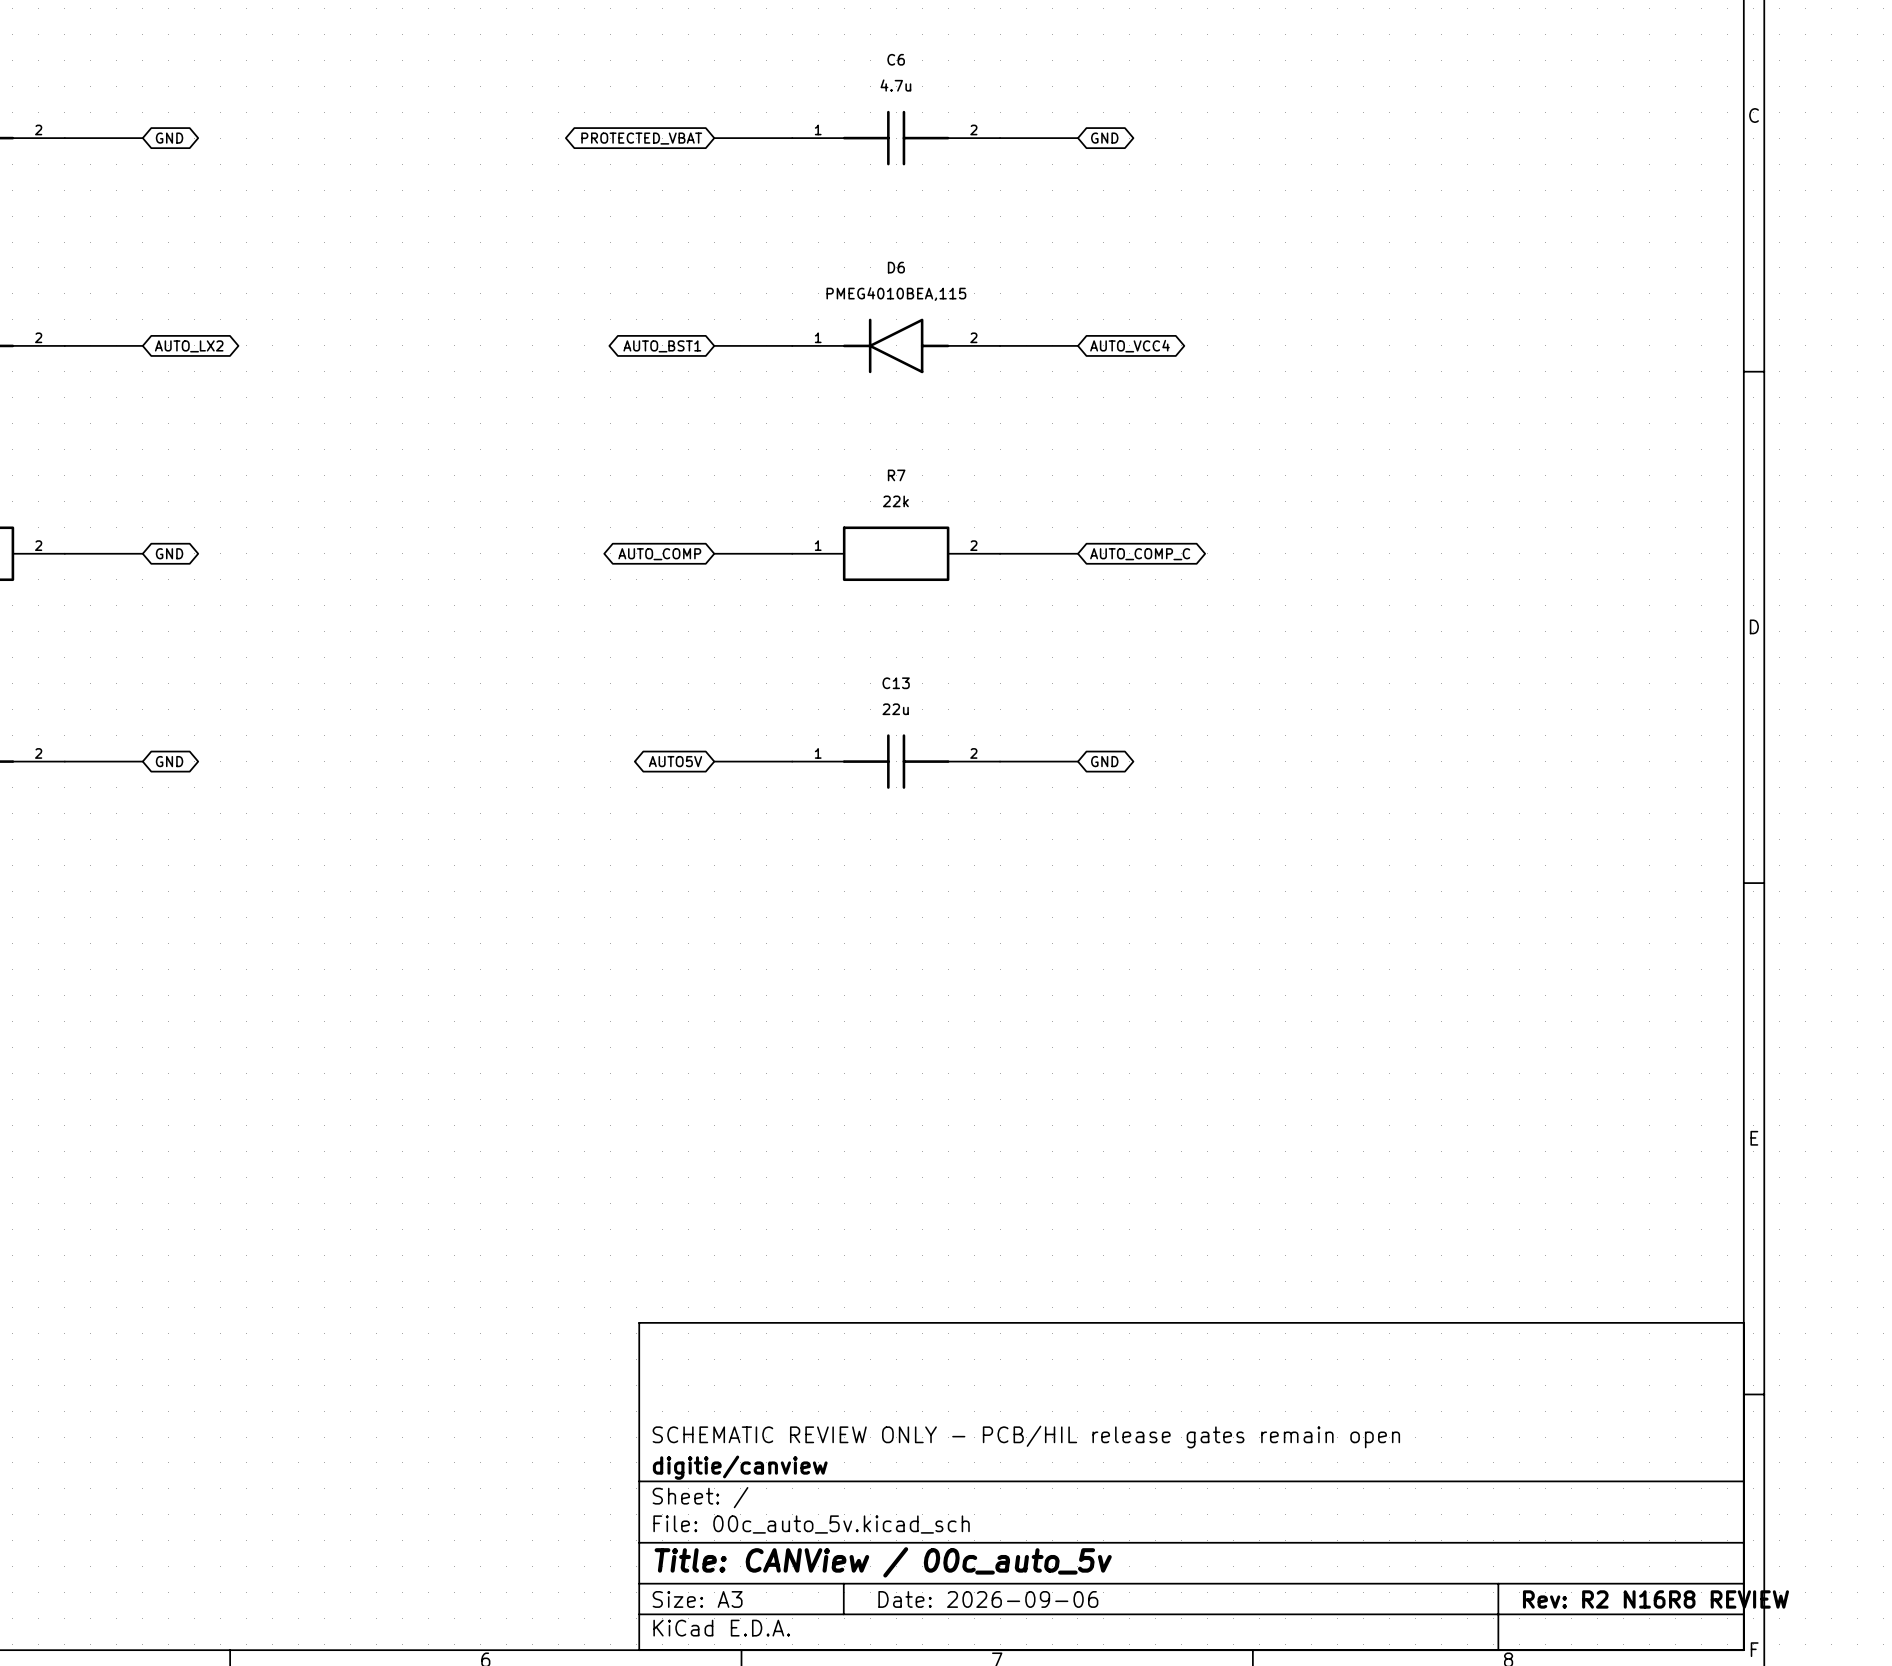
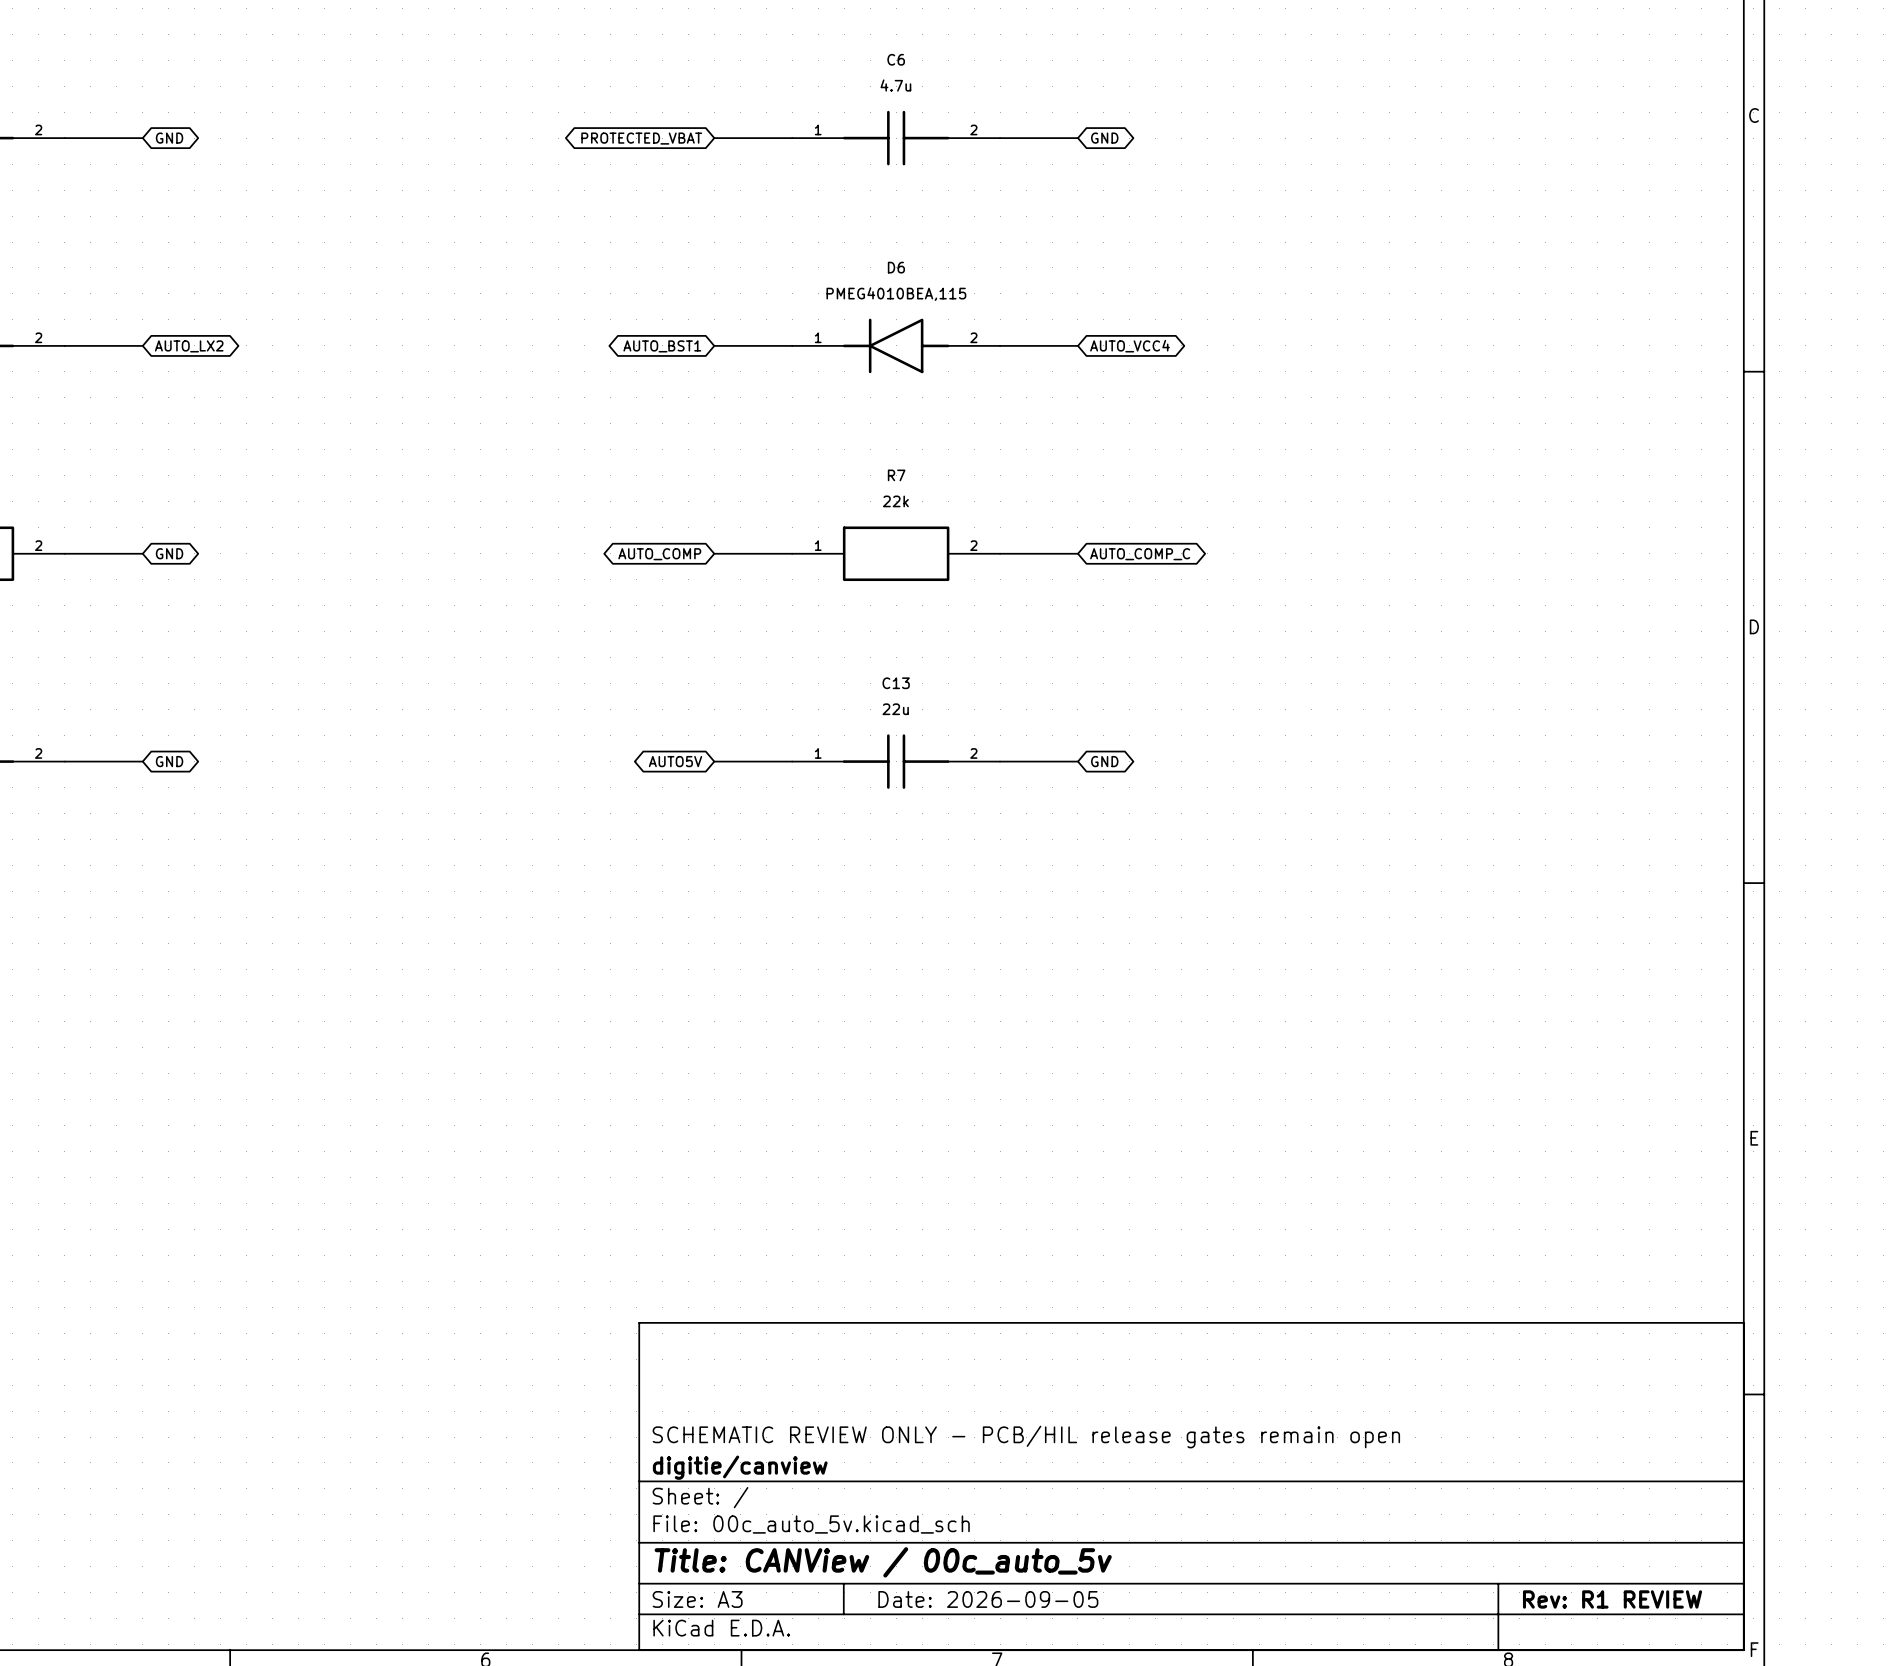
title block: Date: 2026-09-06 (988, 1599) -> Date: 2026-09-05 (988, 1599)
title block: Rev: R2 N16R8 REVIEW (1655, 1599) -> Rev: R1 REVIEW (1612, 1599)

